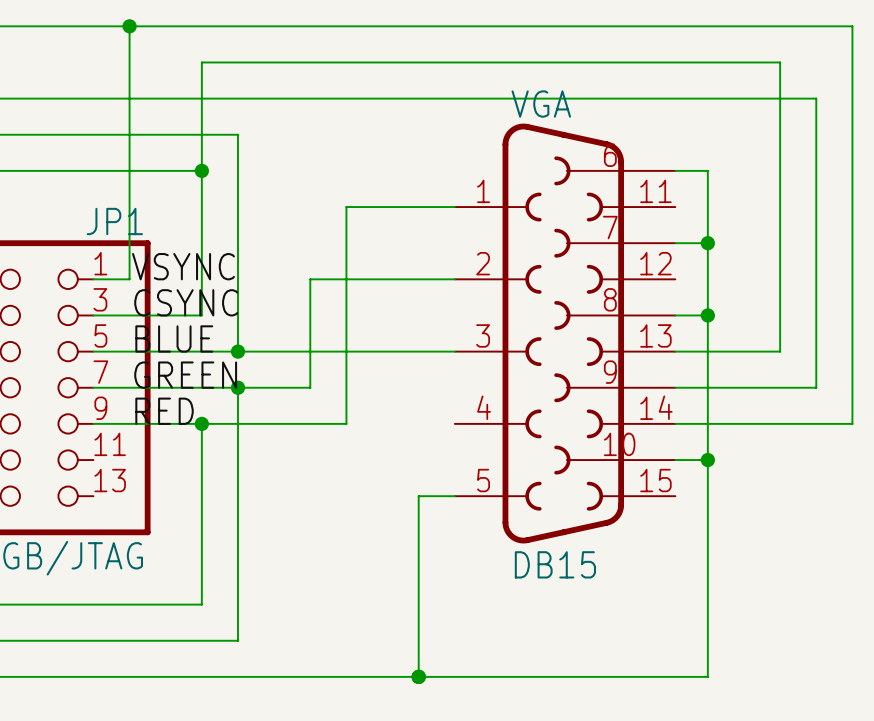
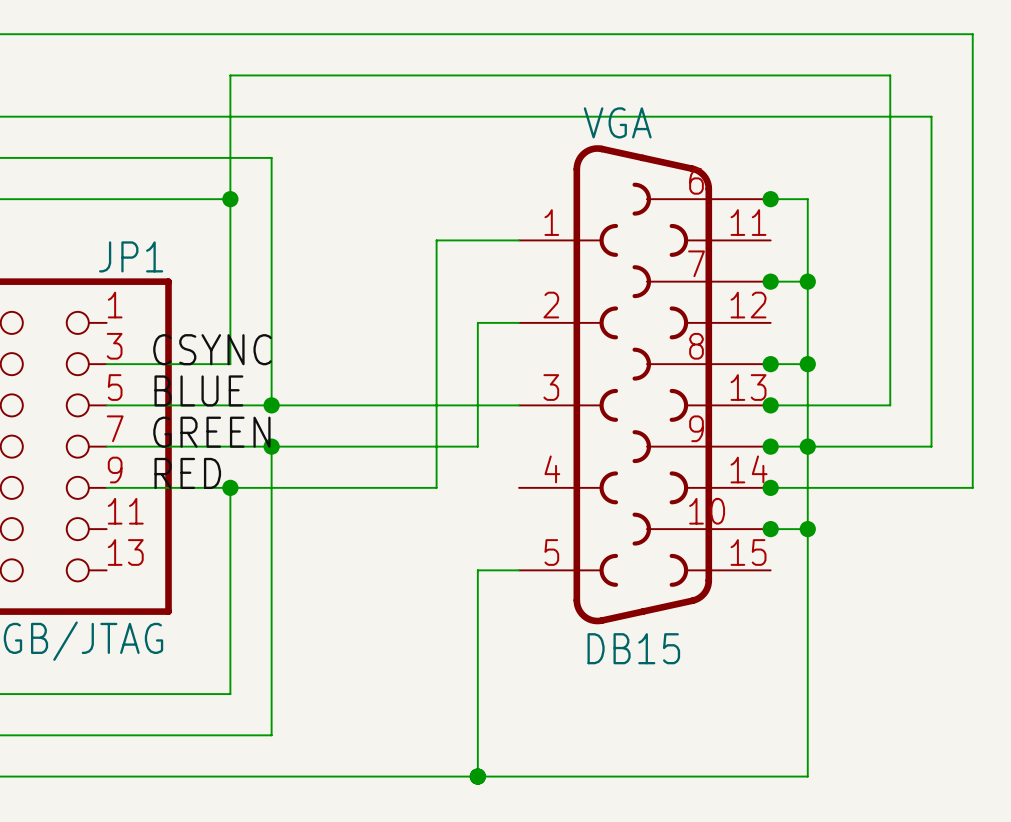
wire: (129, 26) (129, 279) (93, 279) -> none
junction: (129, 26) -> none
junction: none -> (770, 199)
wire: (382, 207) (346, 207) (346, 423) -> (436, 240) (436, 487) (395, 487)
junction: none -> (770, 281)
label: VSYNC (183, 266) -> none
wire: (418, 279) (310, 279) (310, 387) -> (477, 322) (477, 446) (354, 446)
junction: none -> (770, 364)
junction: none -> (770, 405)
junction: none -> (770, 446)
junction: none -> (807, 446)
junction: none -> (770, 487)
junction: none -> (770, 529)

